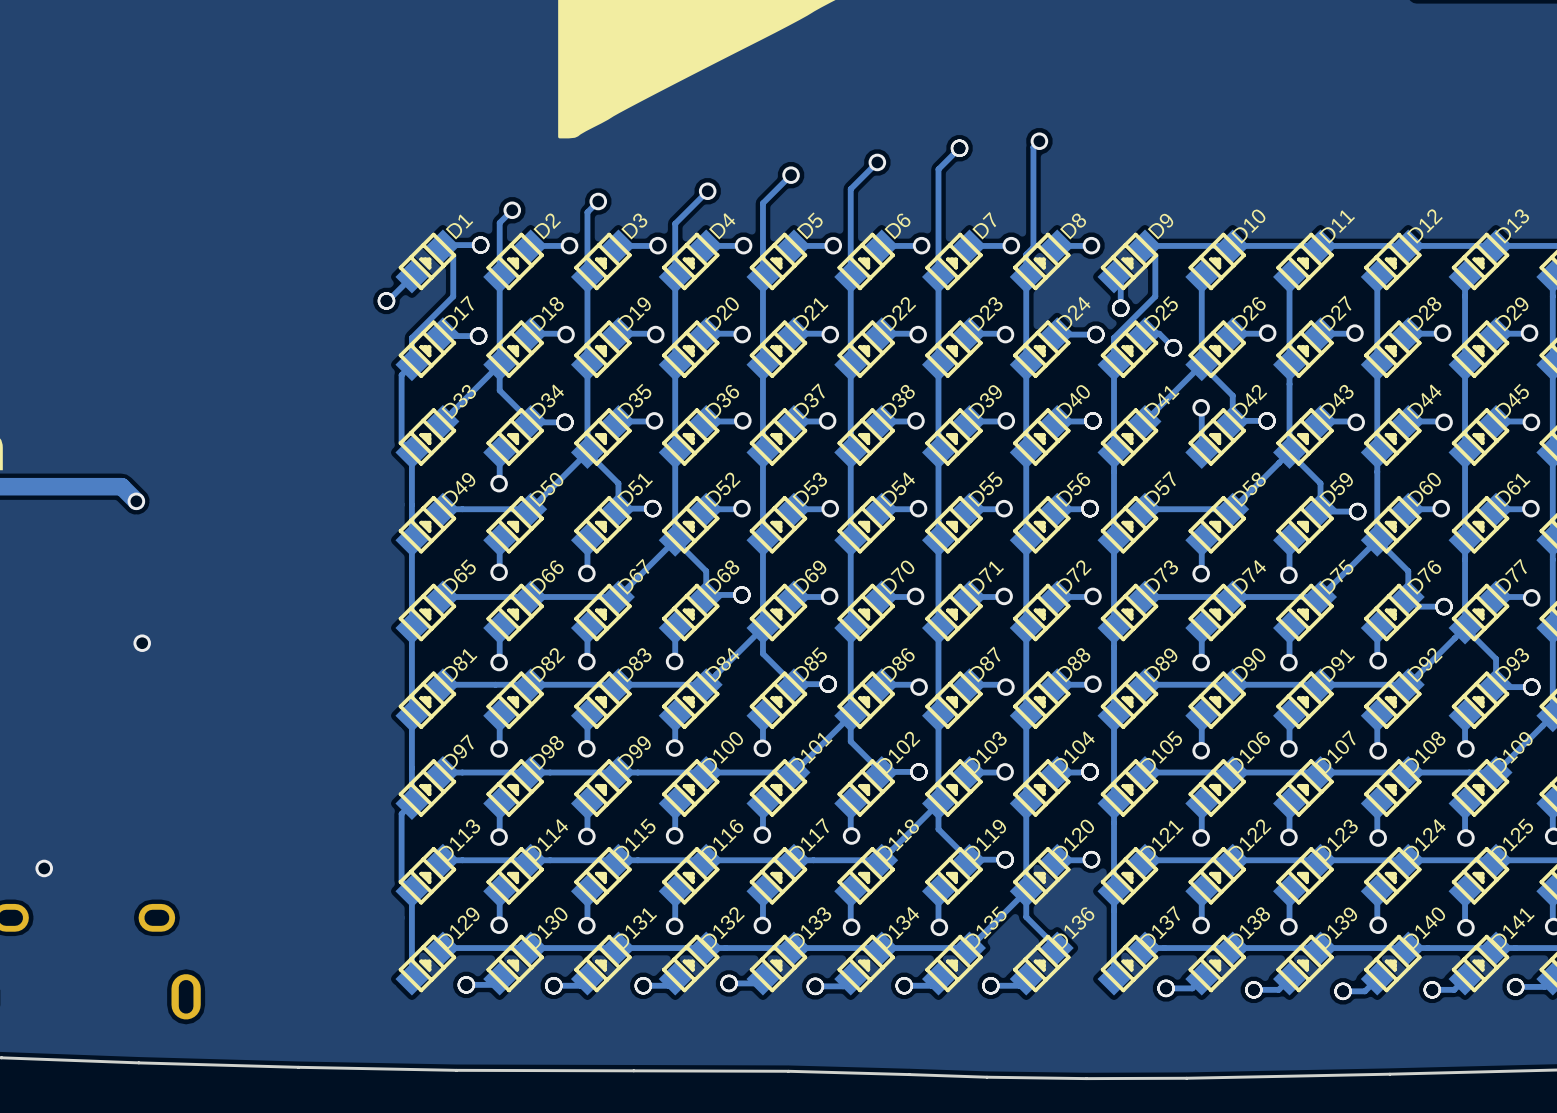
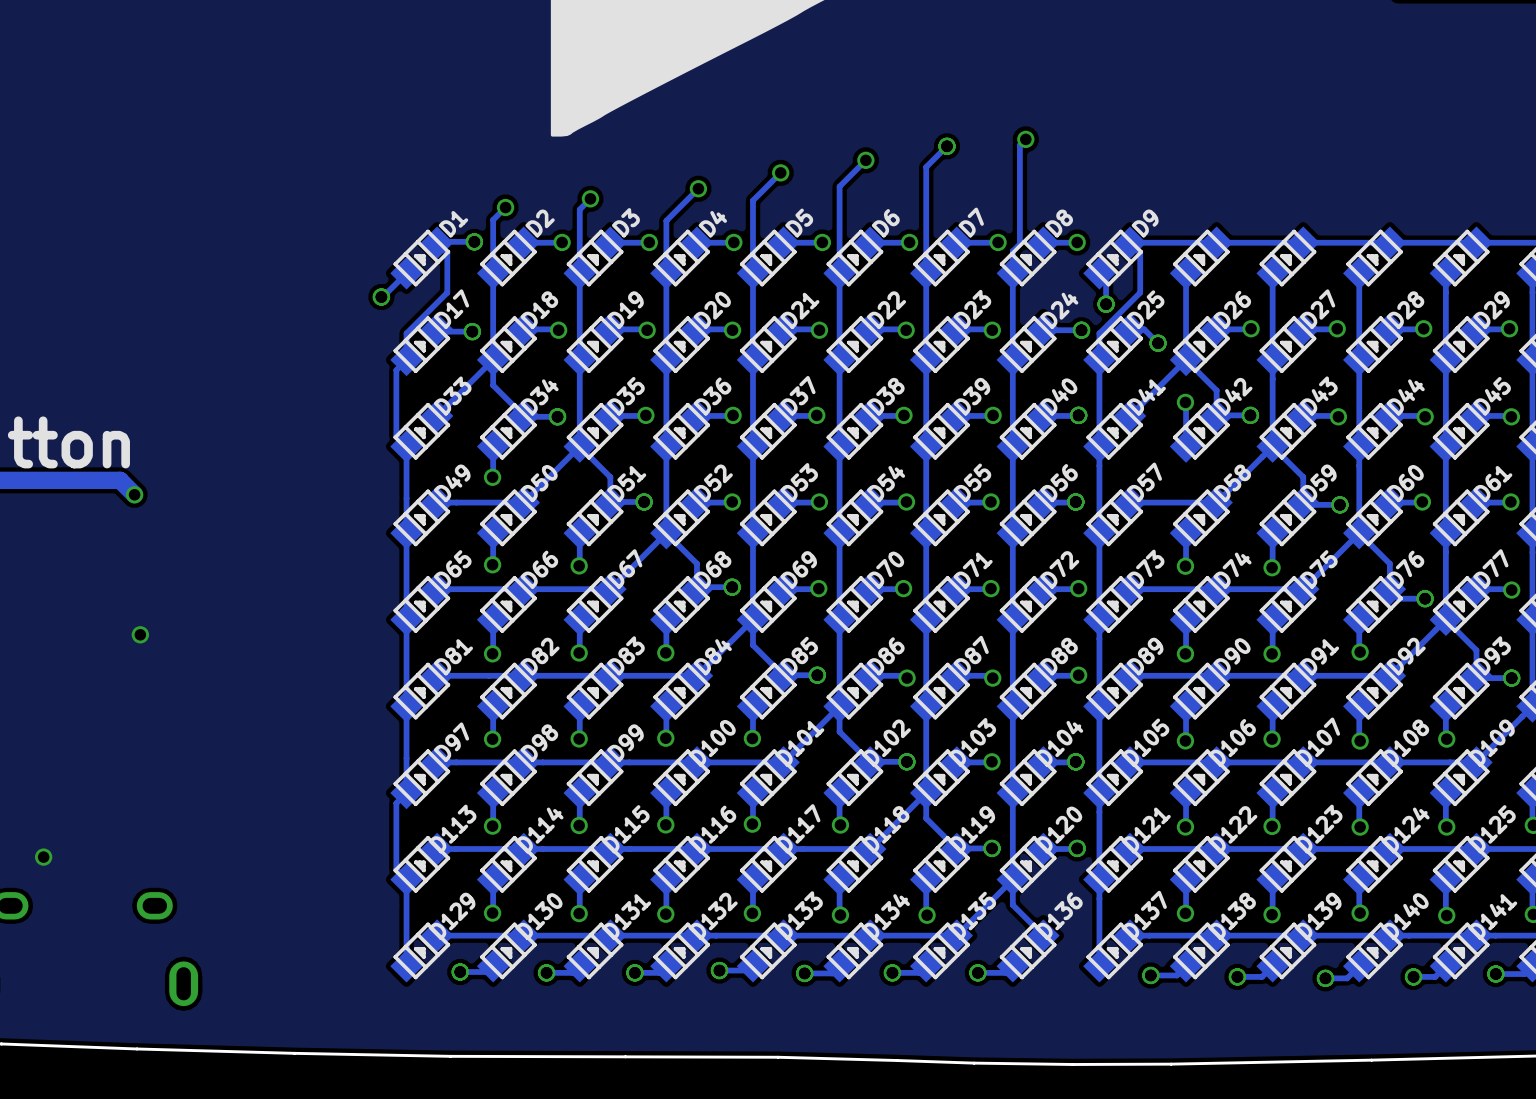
D10 name: D10 (1248, 226) -> none
D11 name: D11 (1337, 226) -> none
D12 name: D12 (1424, 226) -> none
D13 name: D13 (1511, 226) -> none

